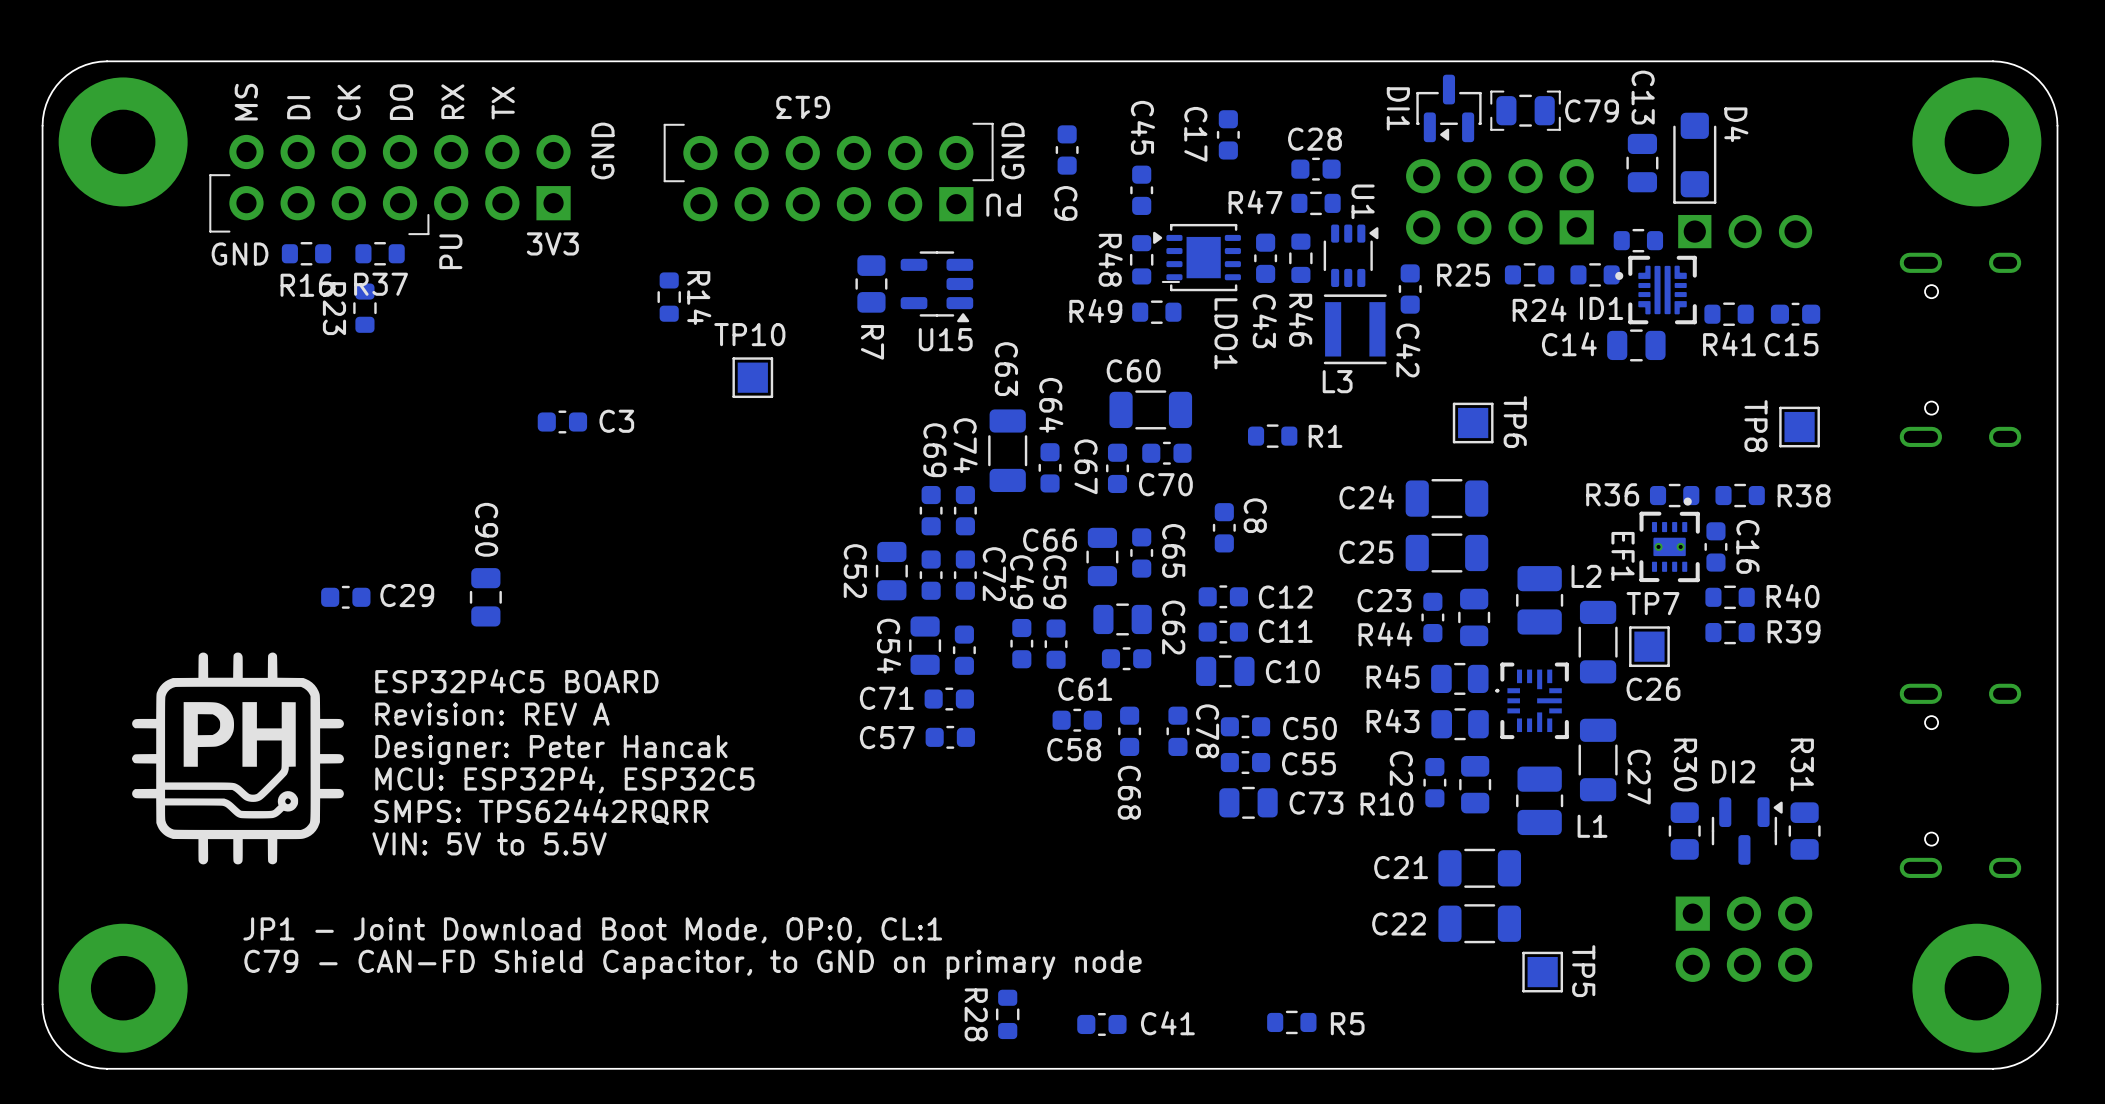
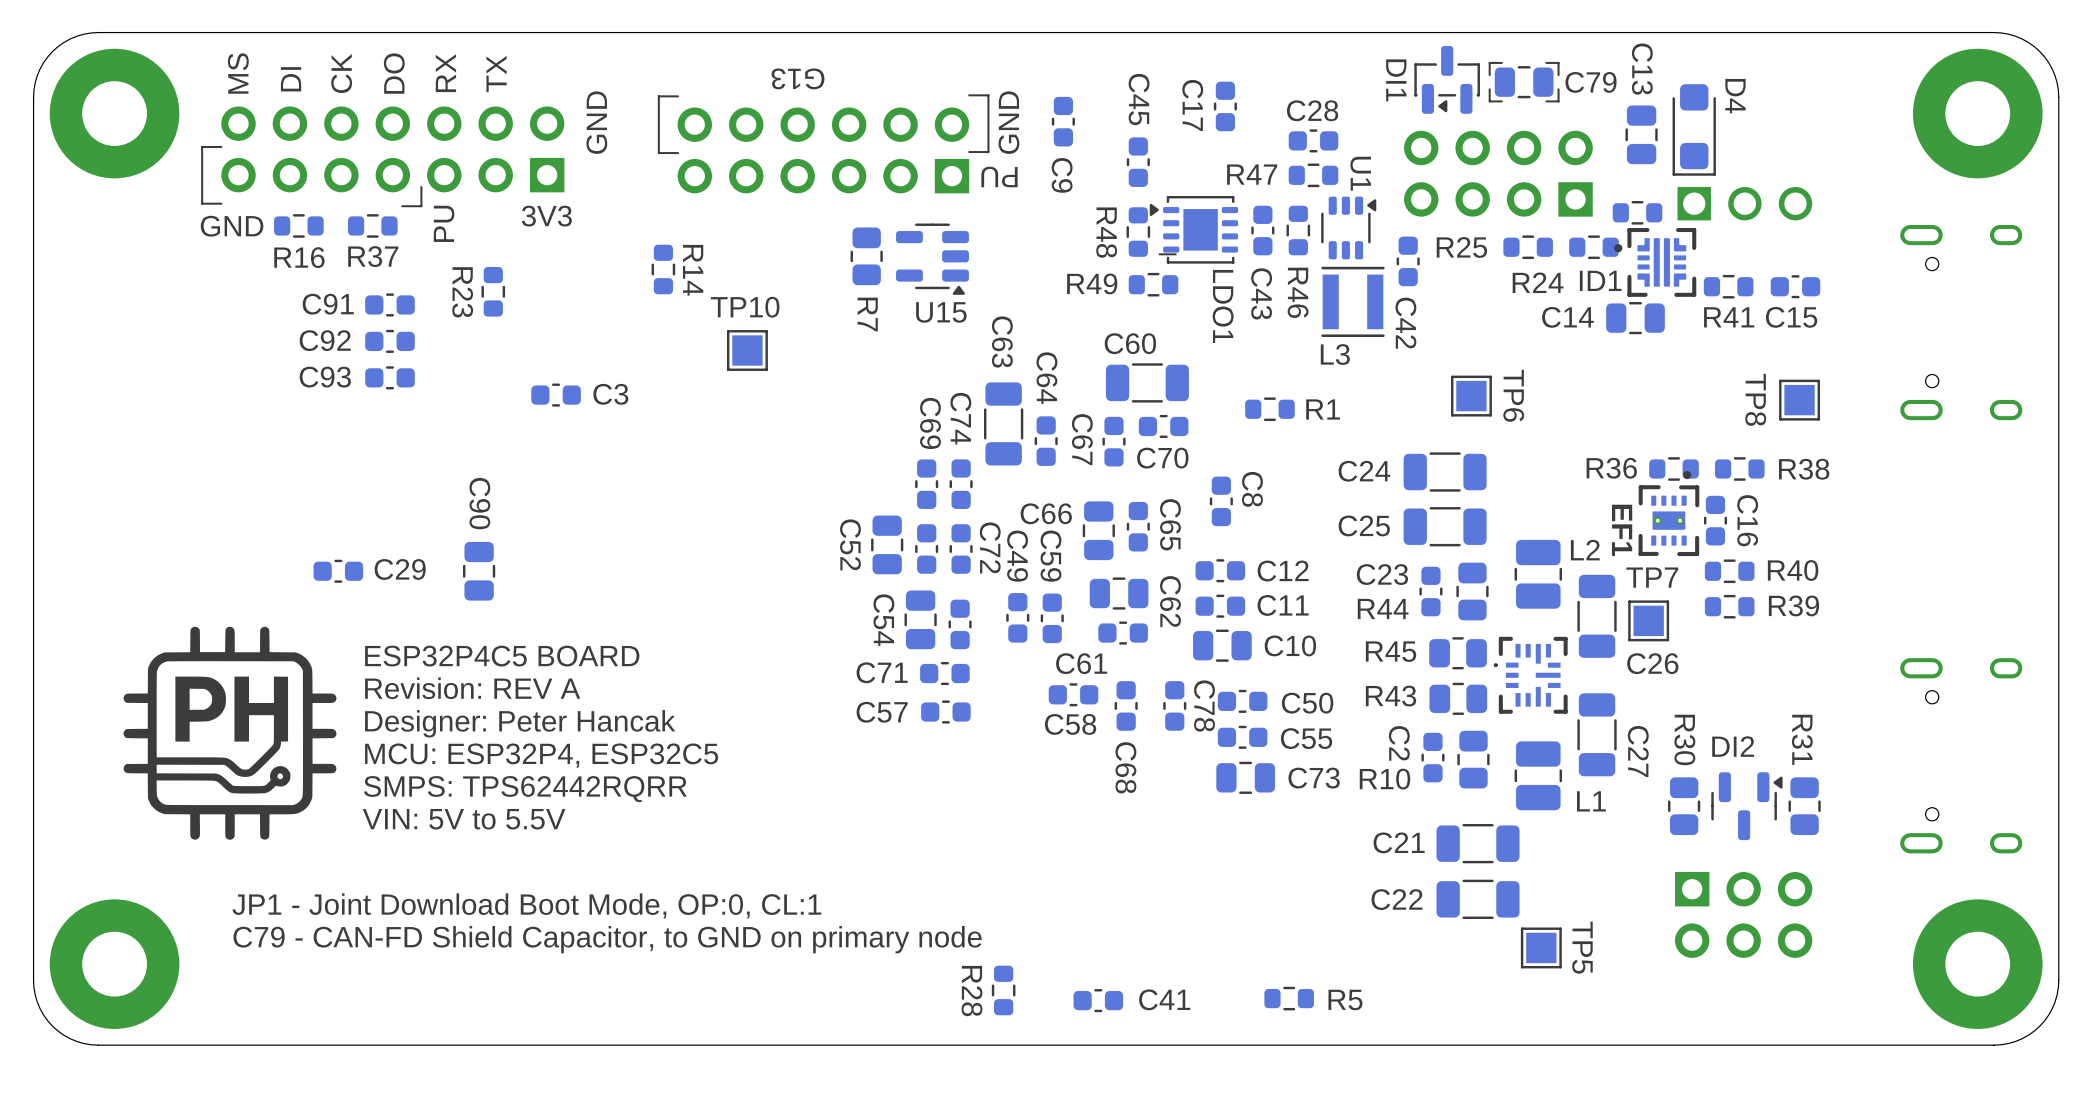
R23 position: (364, 308) -> (493, 291)
C91: none -> (389, 304)
C92: none -> (389, 341)
C93: none -> (389, 377)

